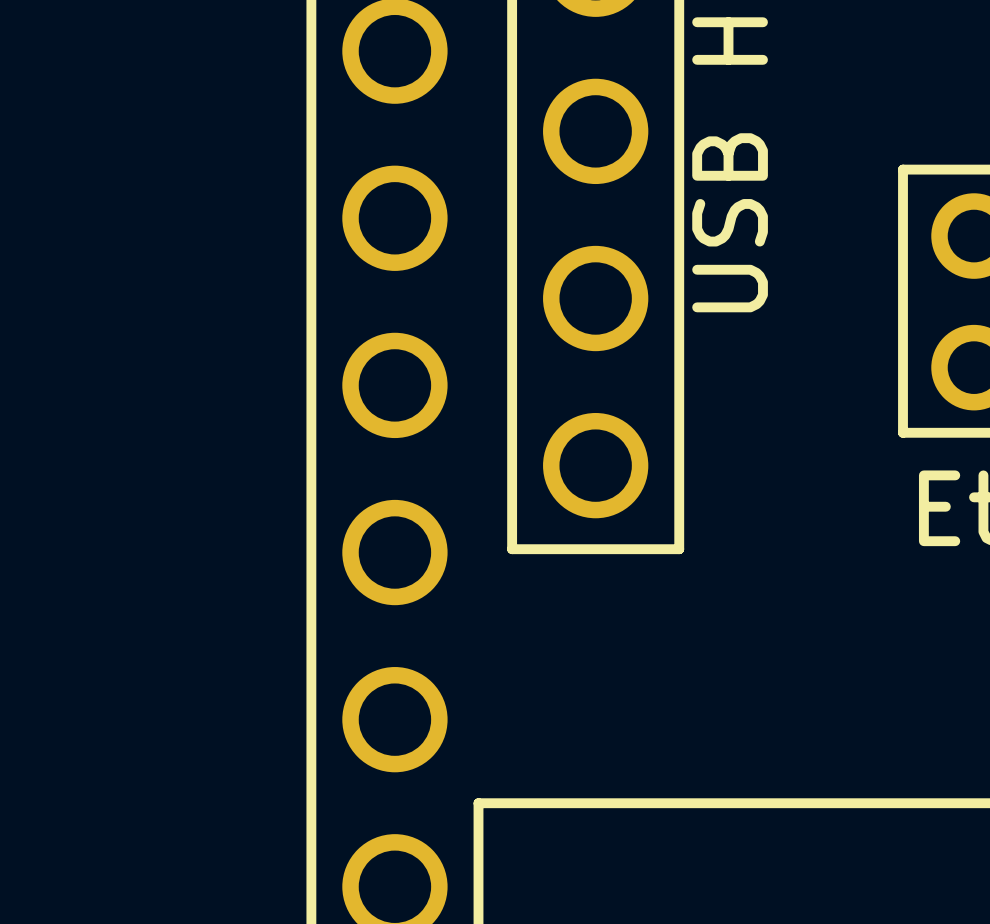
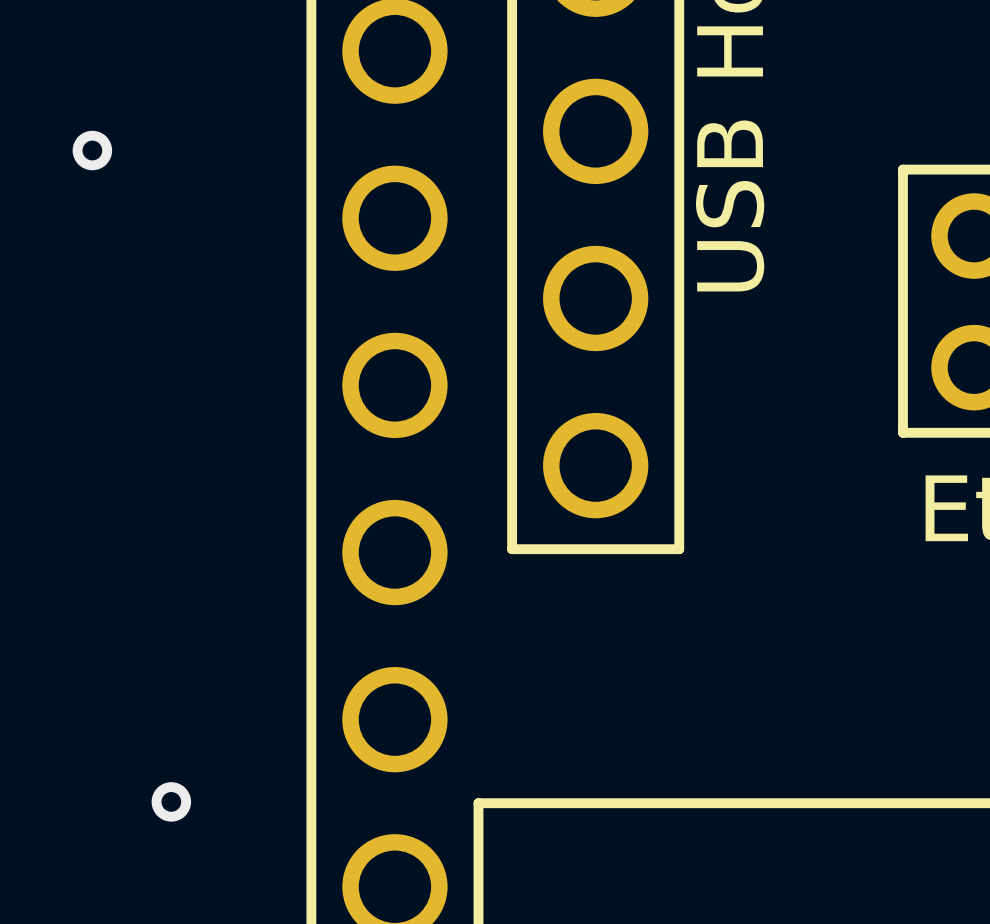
via: none -> (92, 150)
via: none -> (171, 801)

